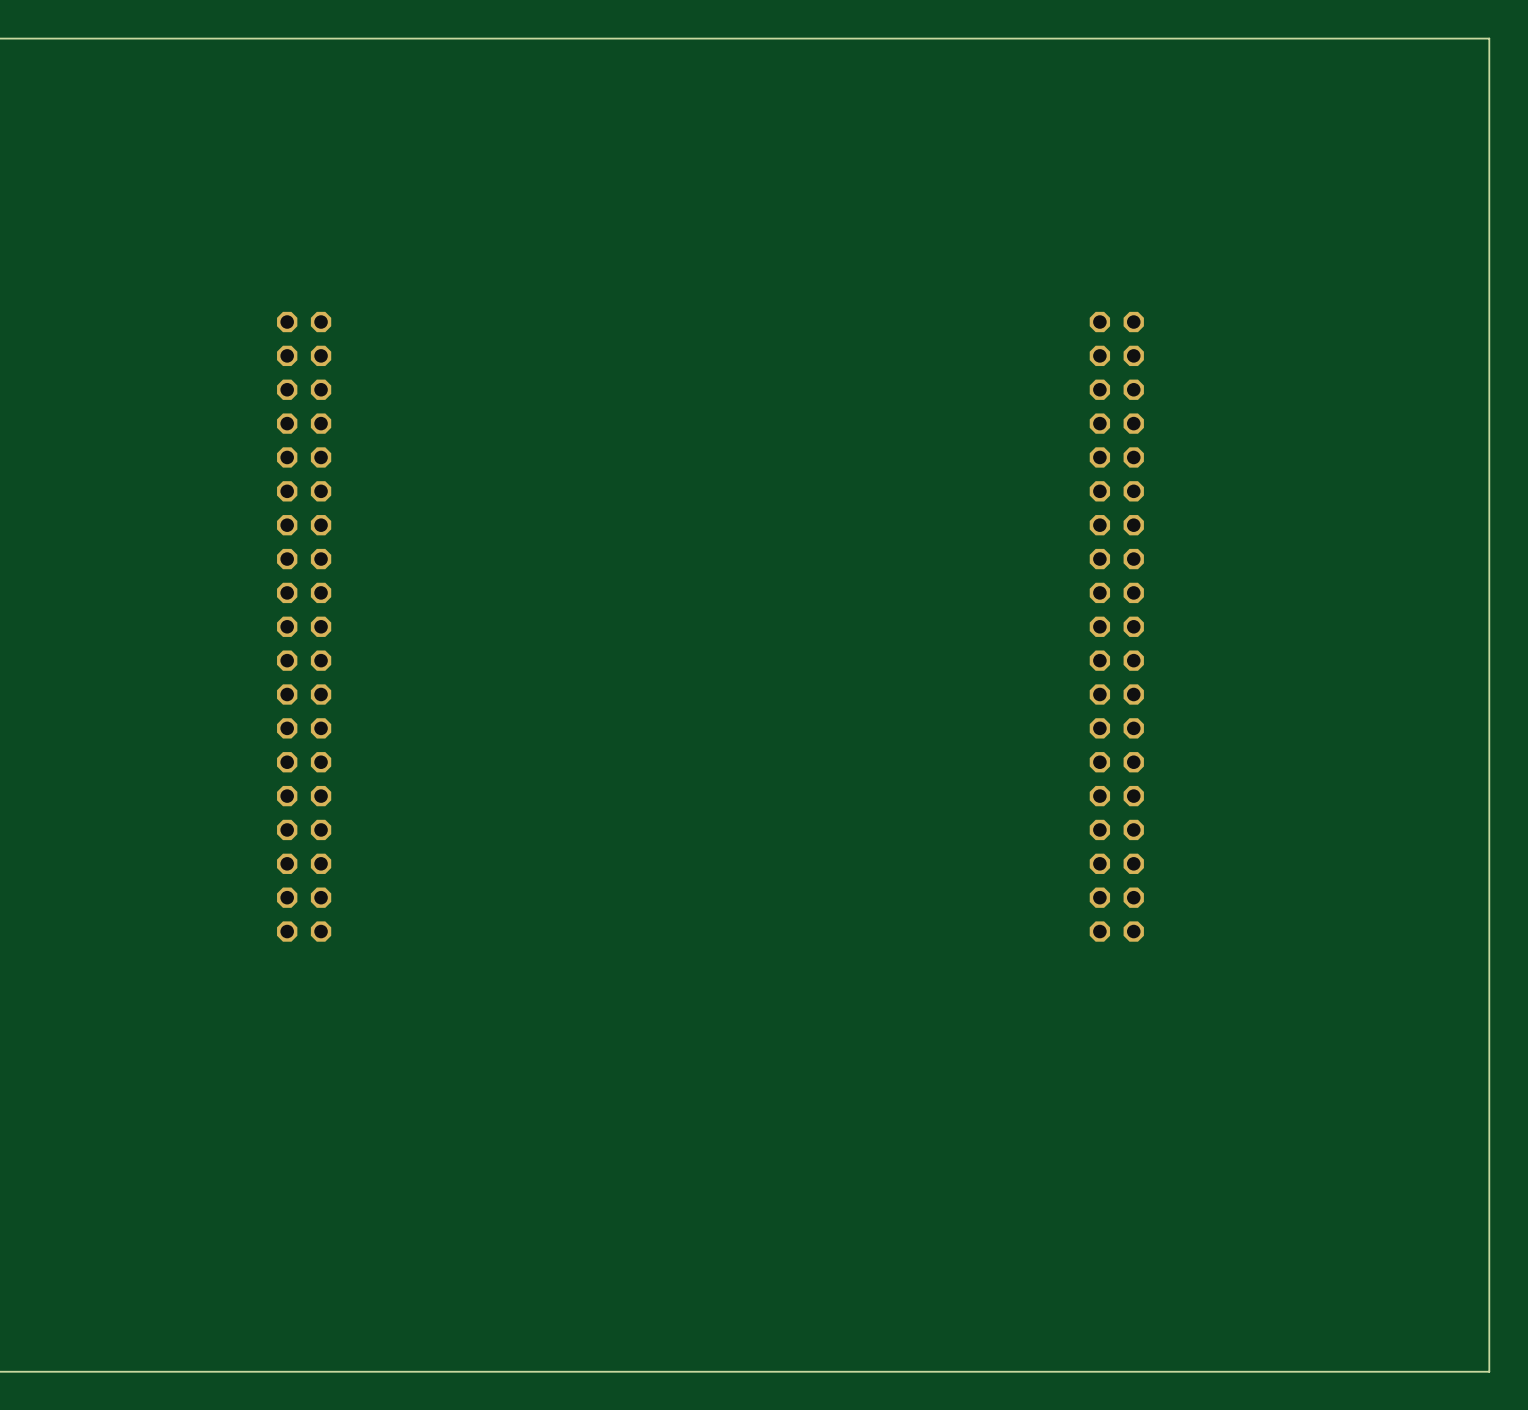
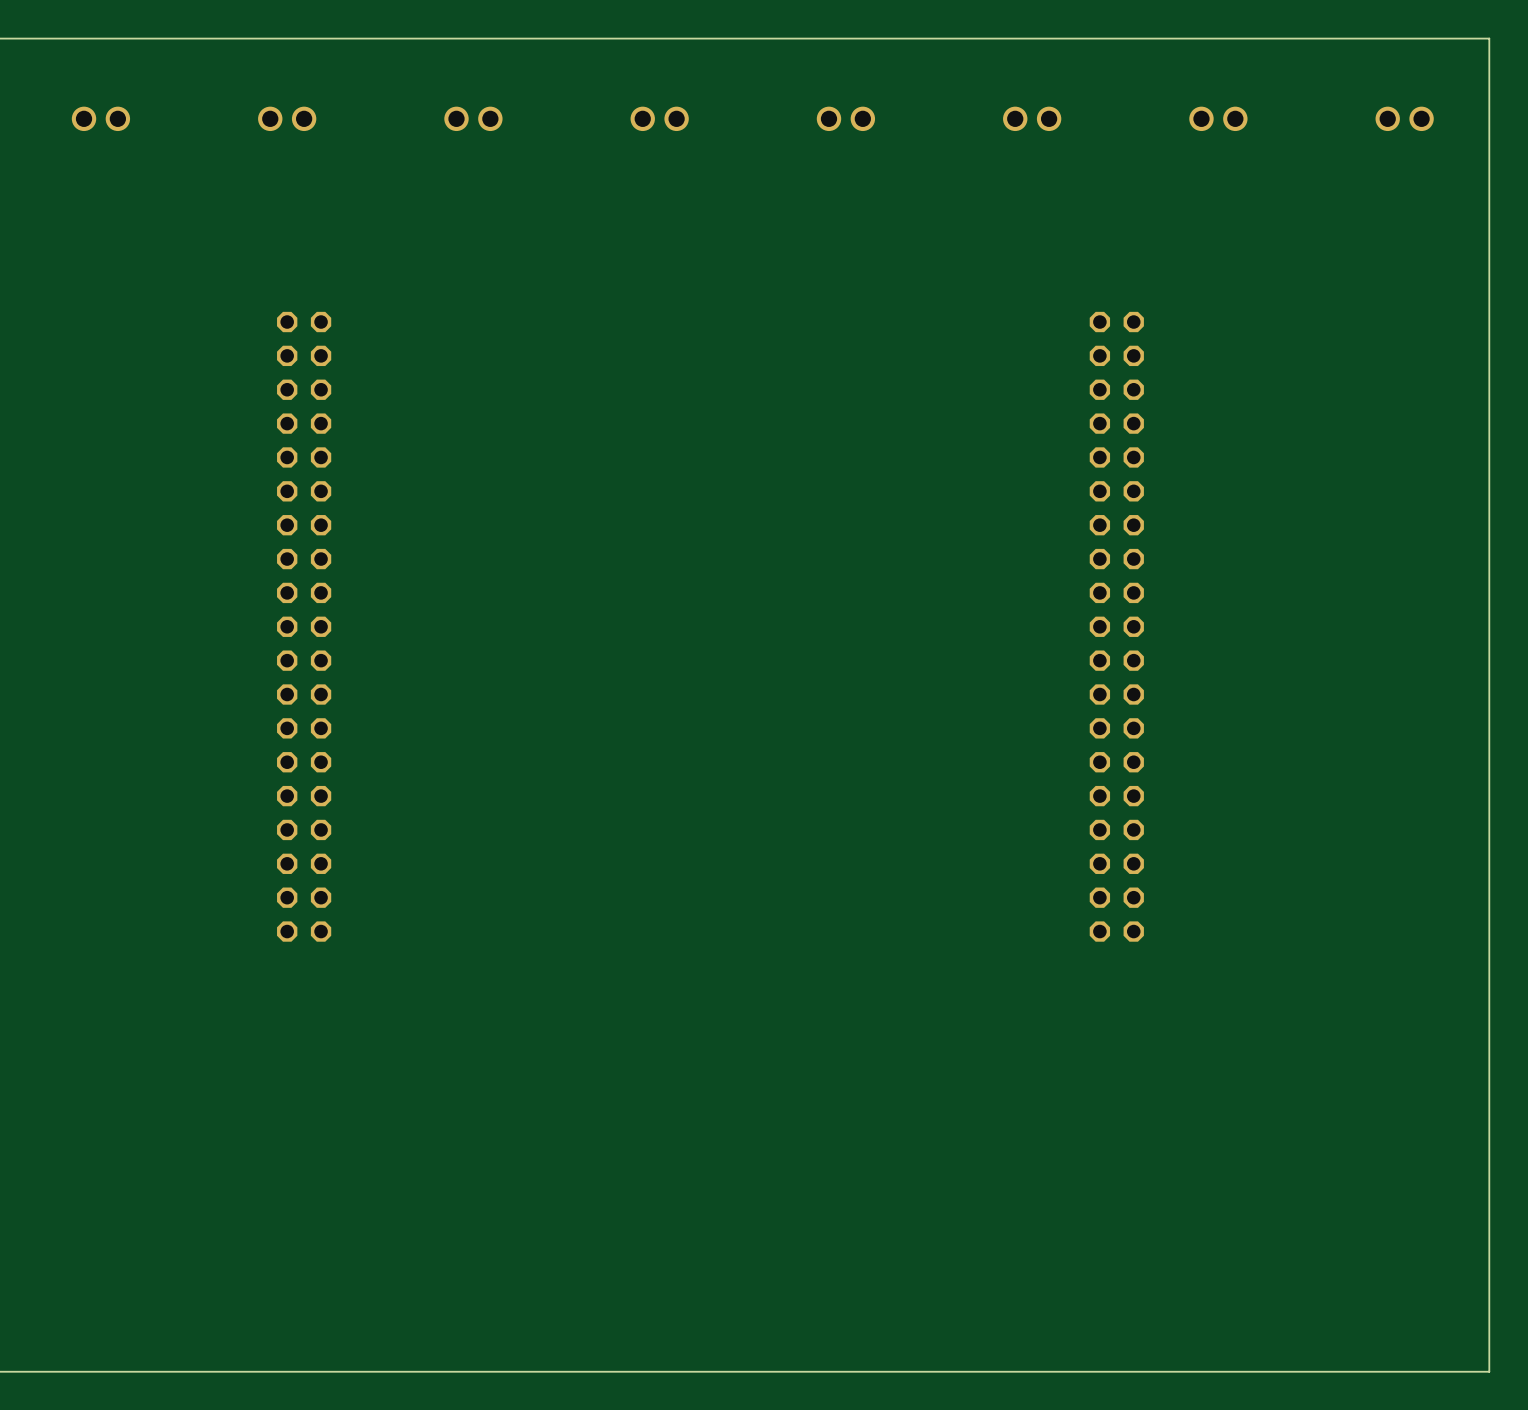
part: none -> (100, 118)
part: none -> (287, 118)
part: none -> (473, 118)
part: none -> (659, 118)
part: none -> (845, 118)
part: none -> (1032, 118)
part: none -> (1218, 118)
part: none -> (1404, 118)

